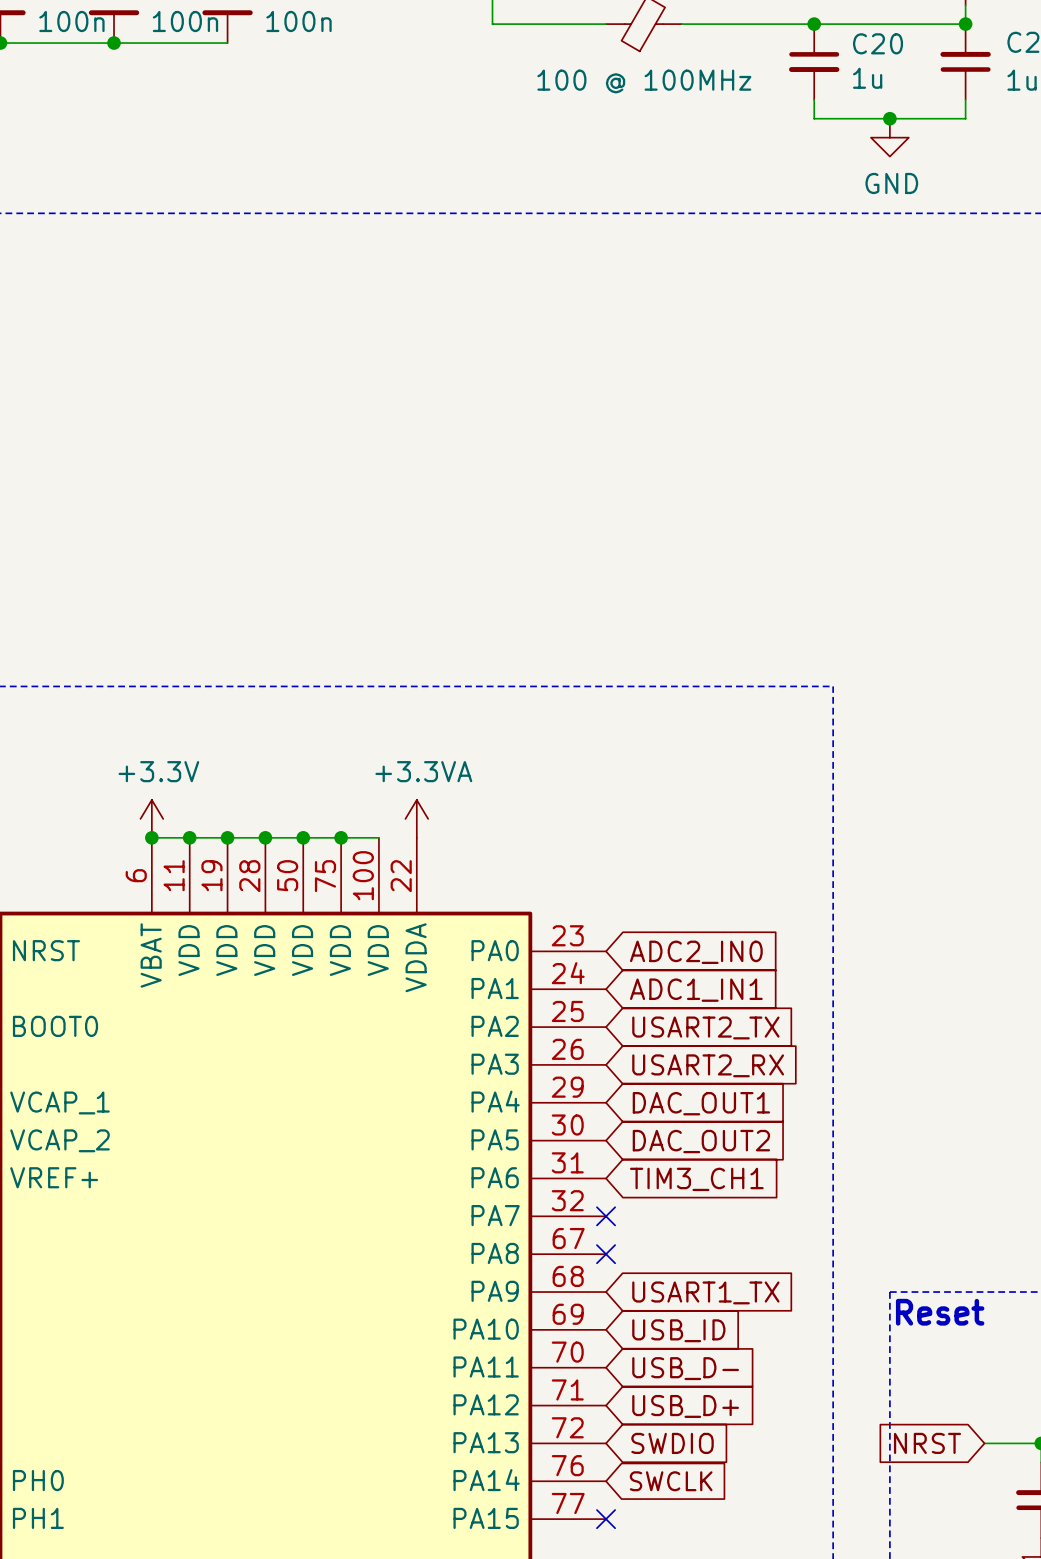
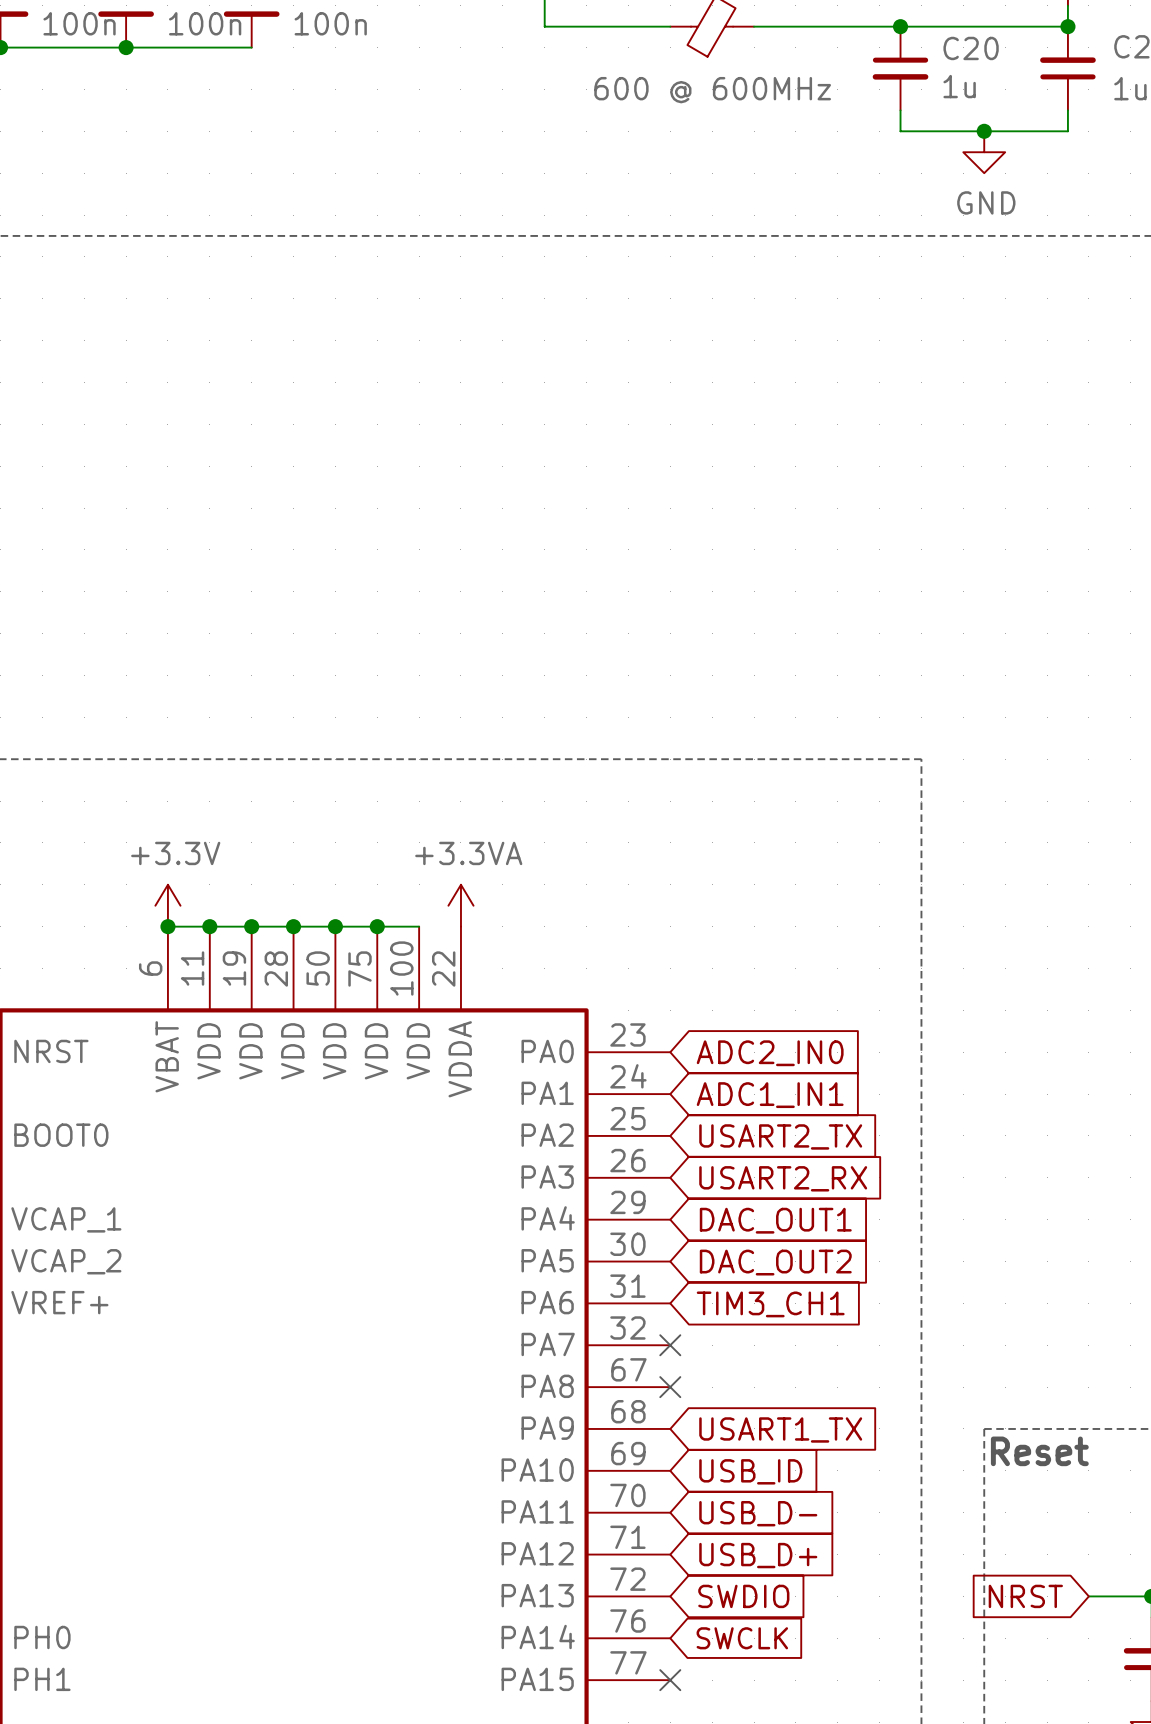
part value: 100 @ 100MHz (644, 81) -> 600 @ 600MHz (712, 90)

